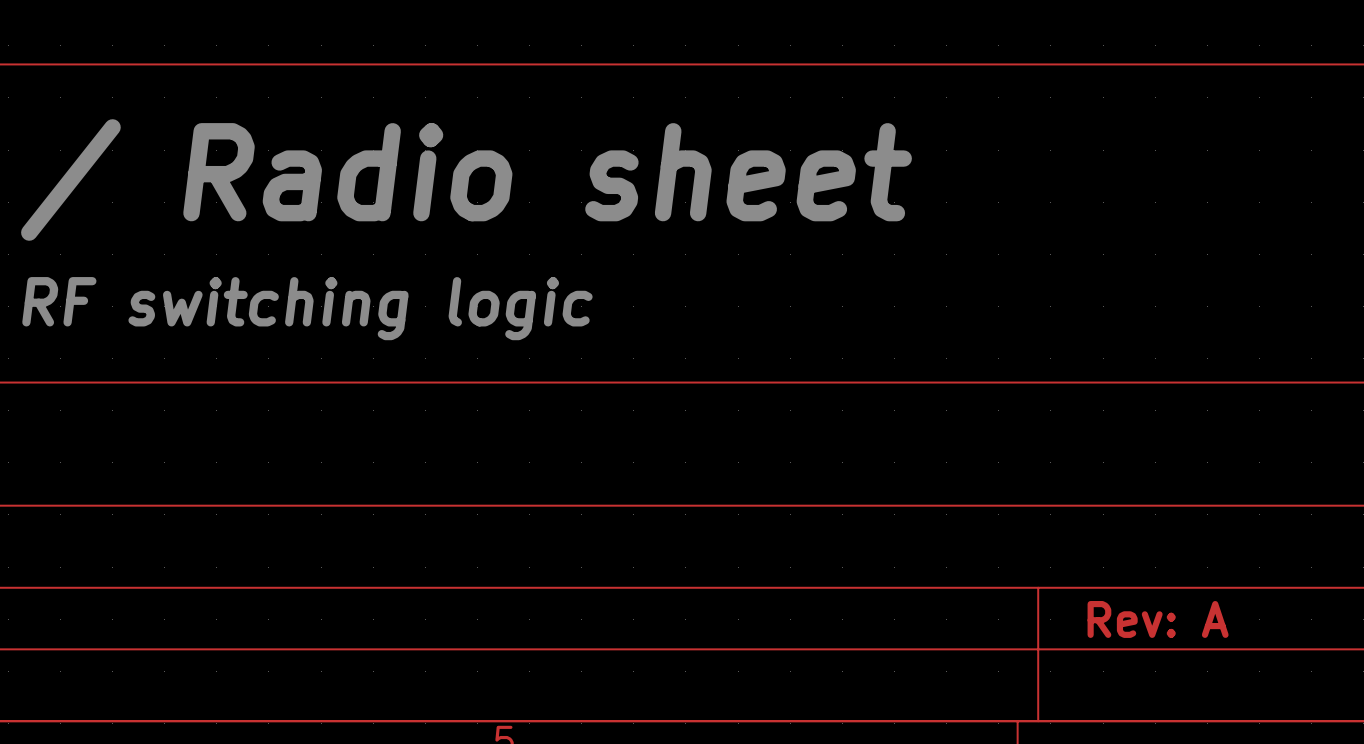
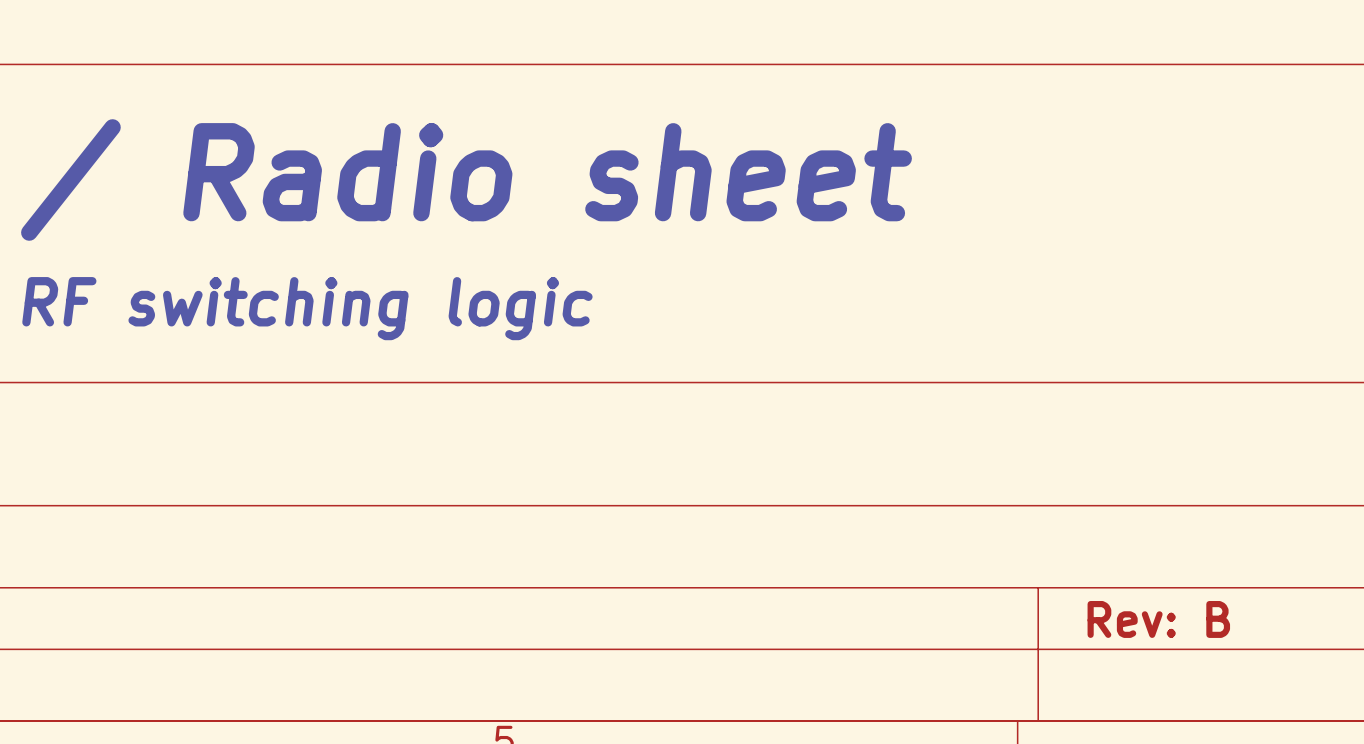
title block: Rev: A (1158, 619) -> Rev: B (1158, 619)

